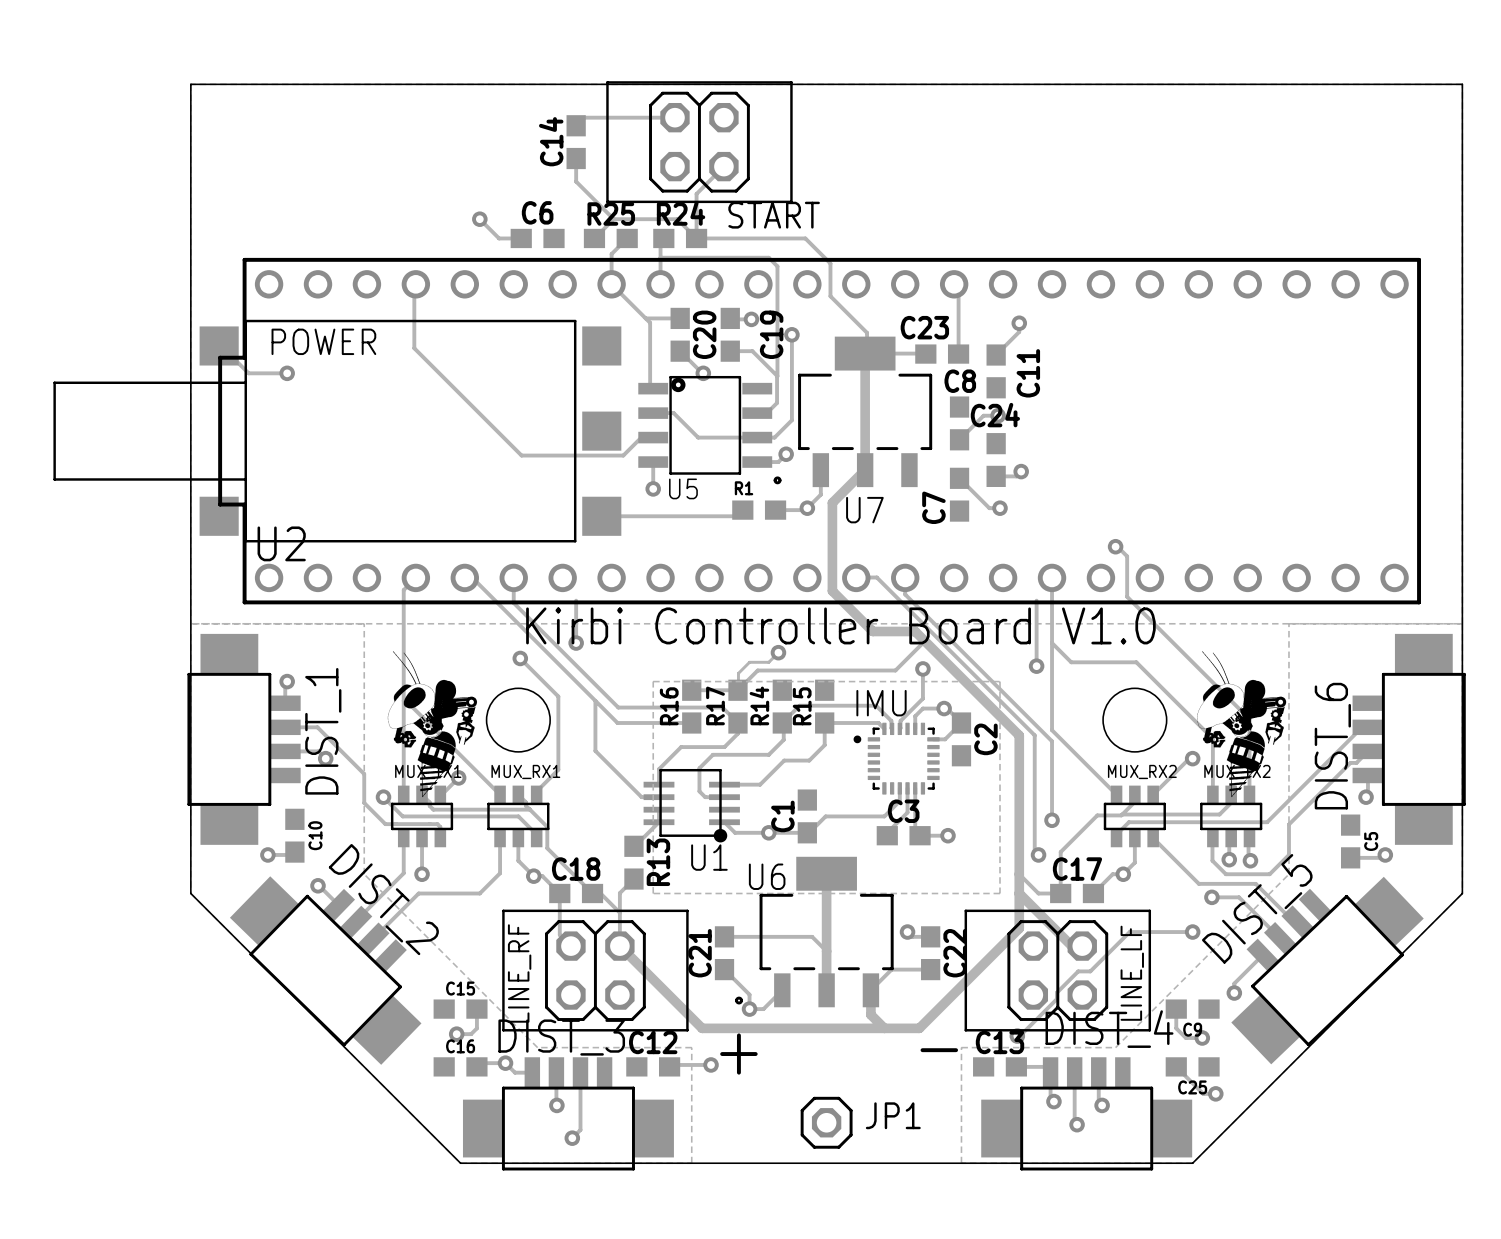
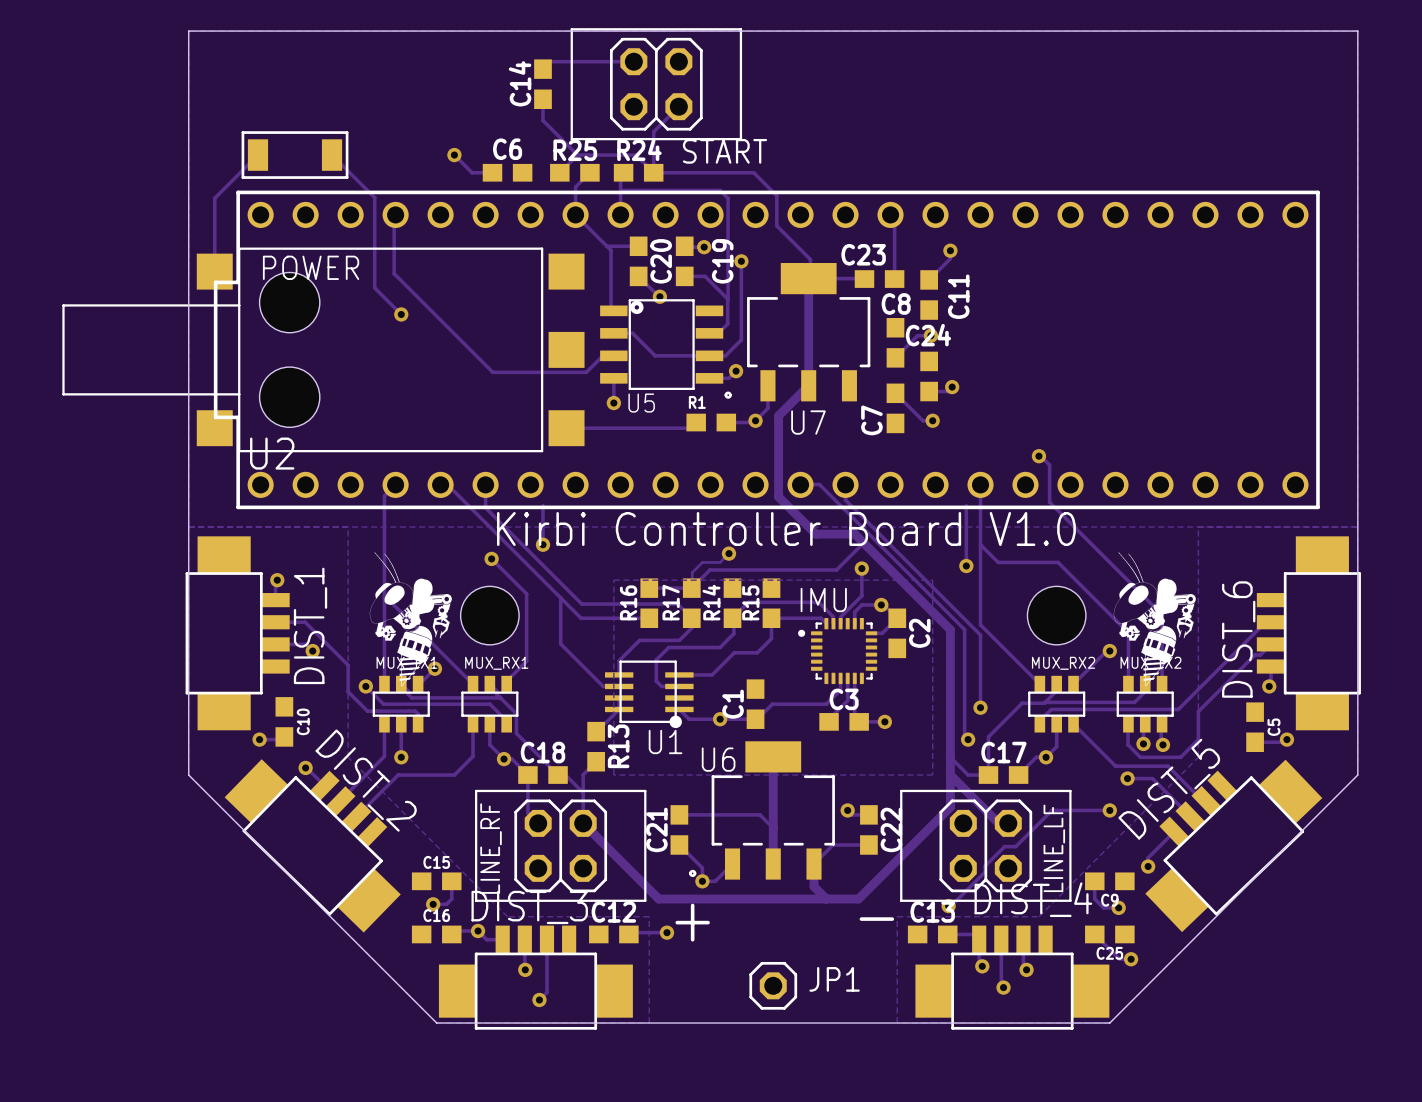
track: none -> (257, 155) (214, 198) (214, 271)
part: none -> (295, 155)
track: none -> (332, 155) (374, 197) (374, 287) (401, 314)
track: (229, 354) (248, 373) (287, 373) -> none
via: (287, 373) -> none
via: none -> (401, 314)
part: none -> (289, 349)

